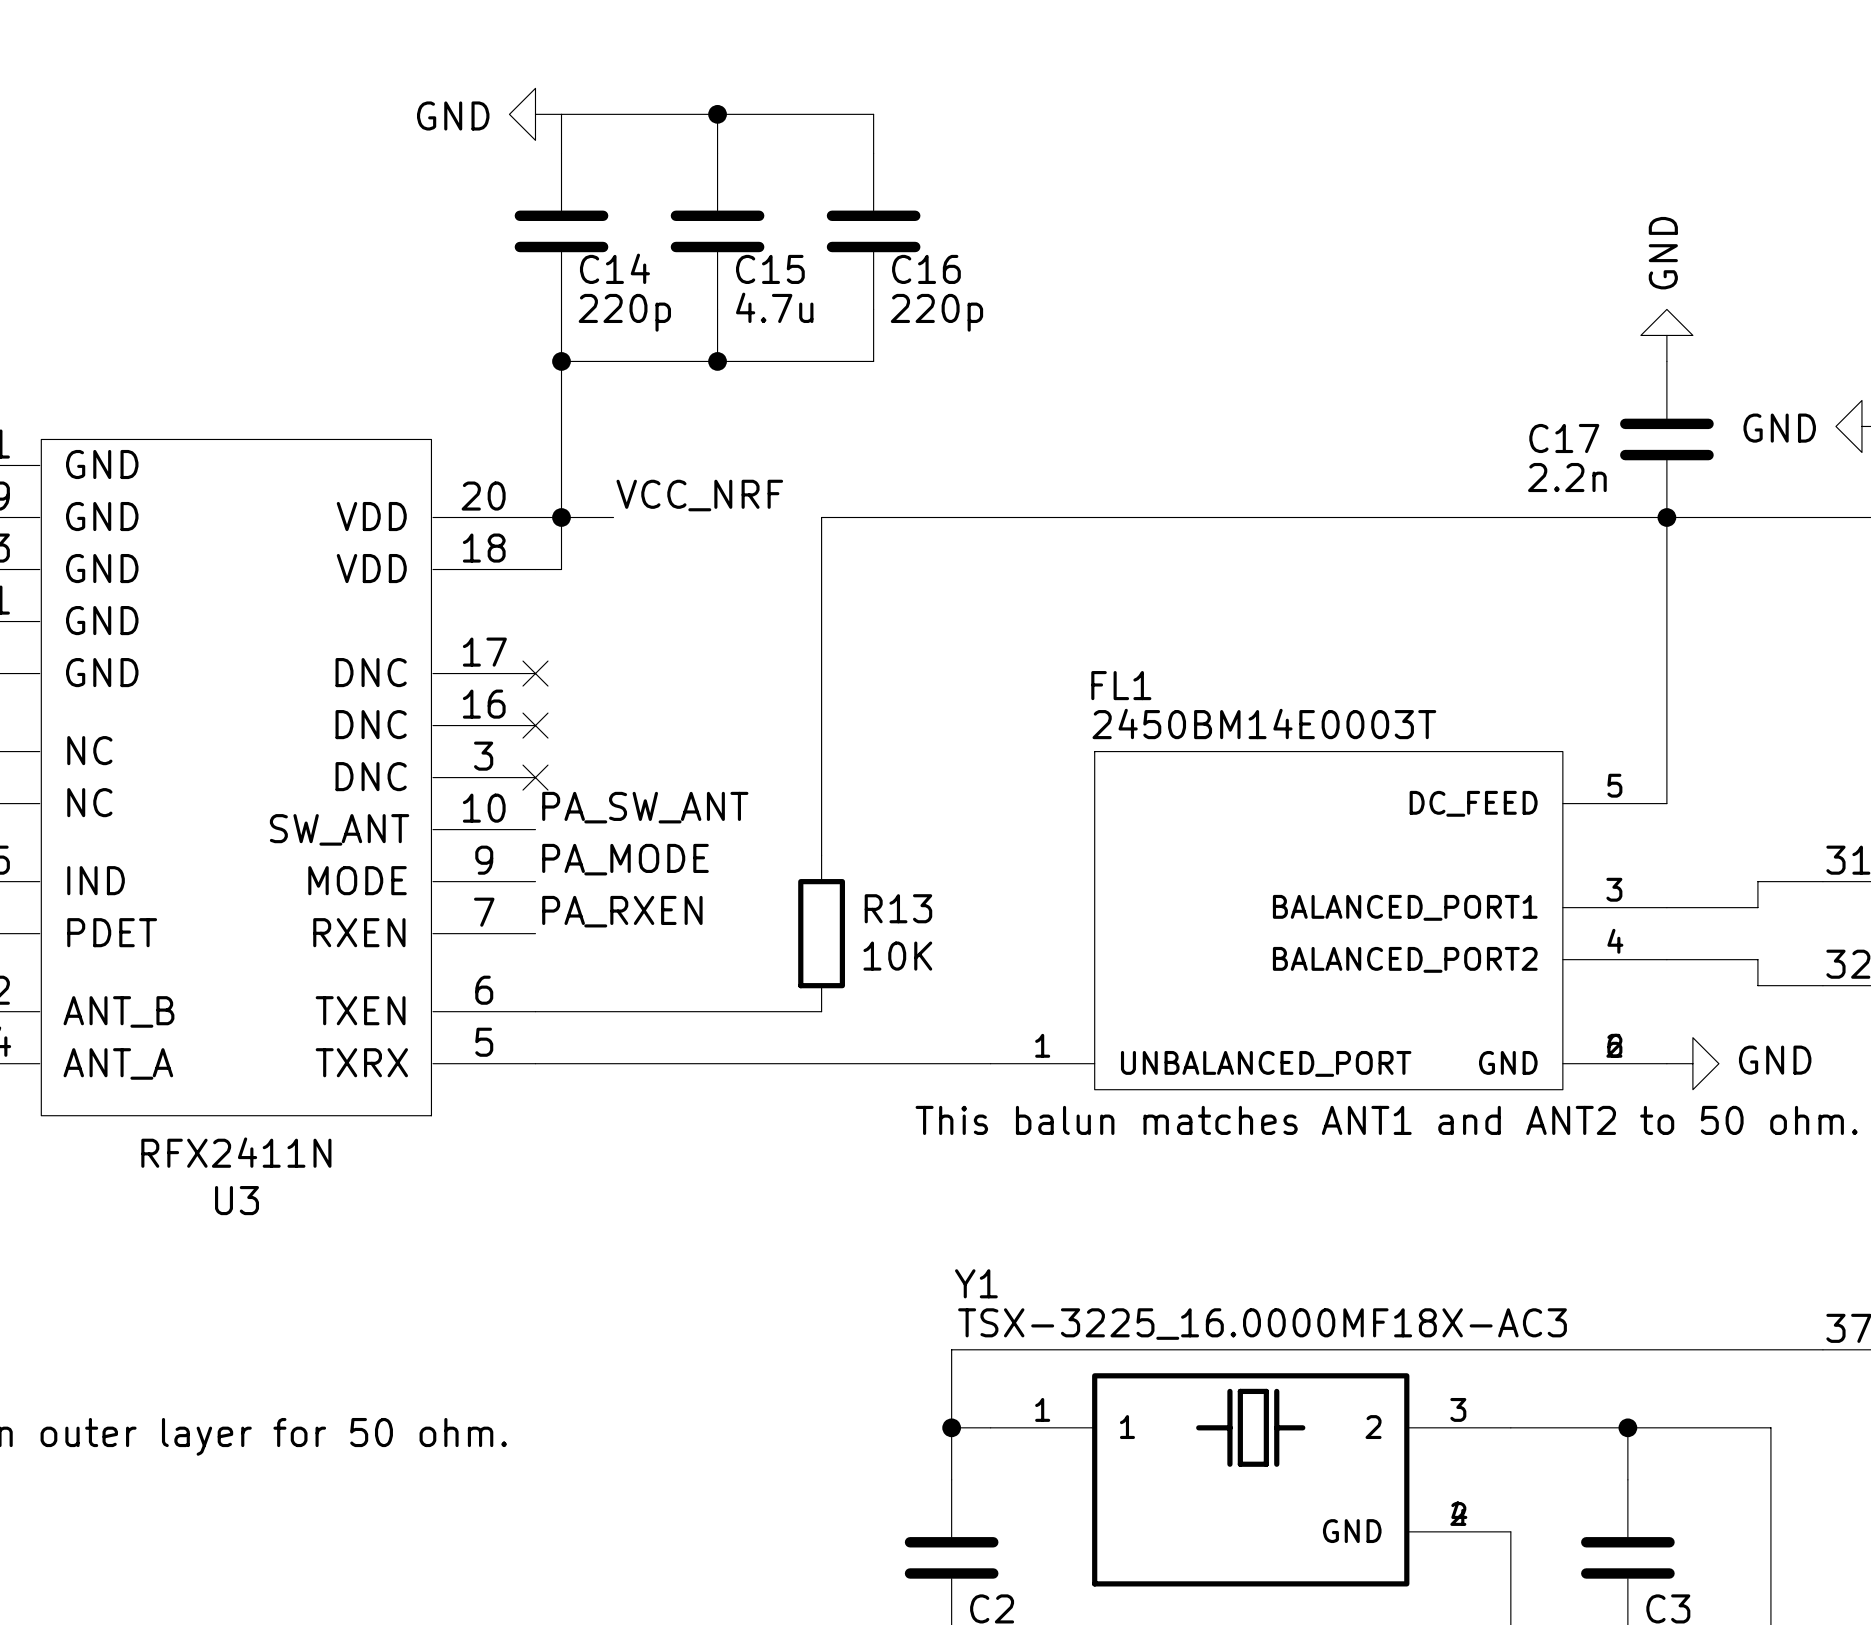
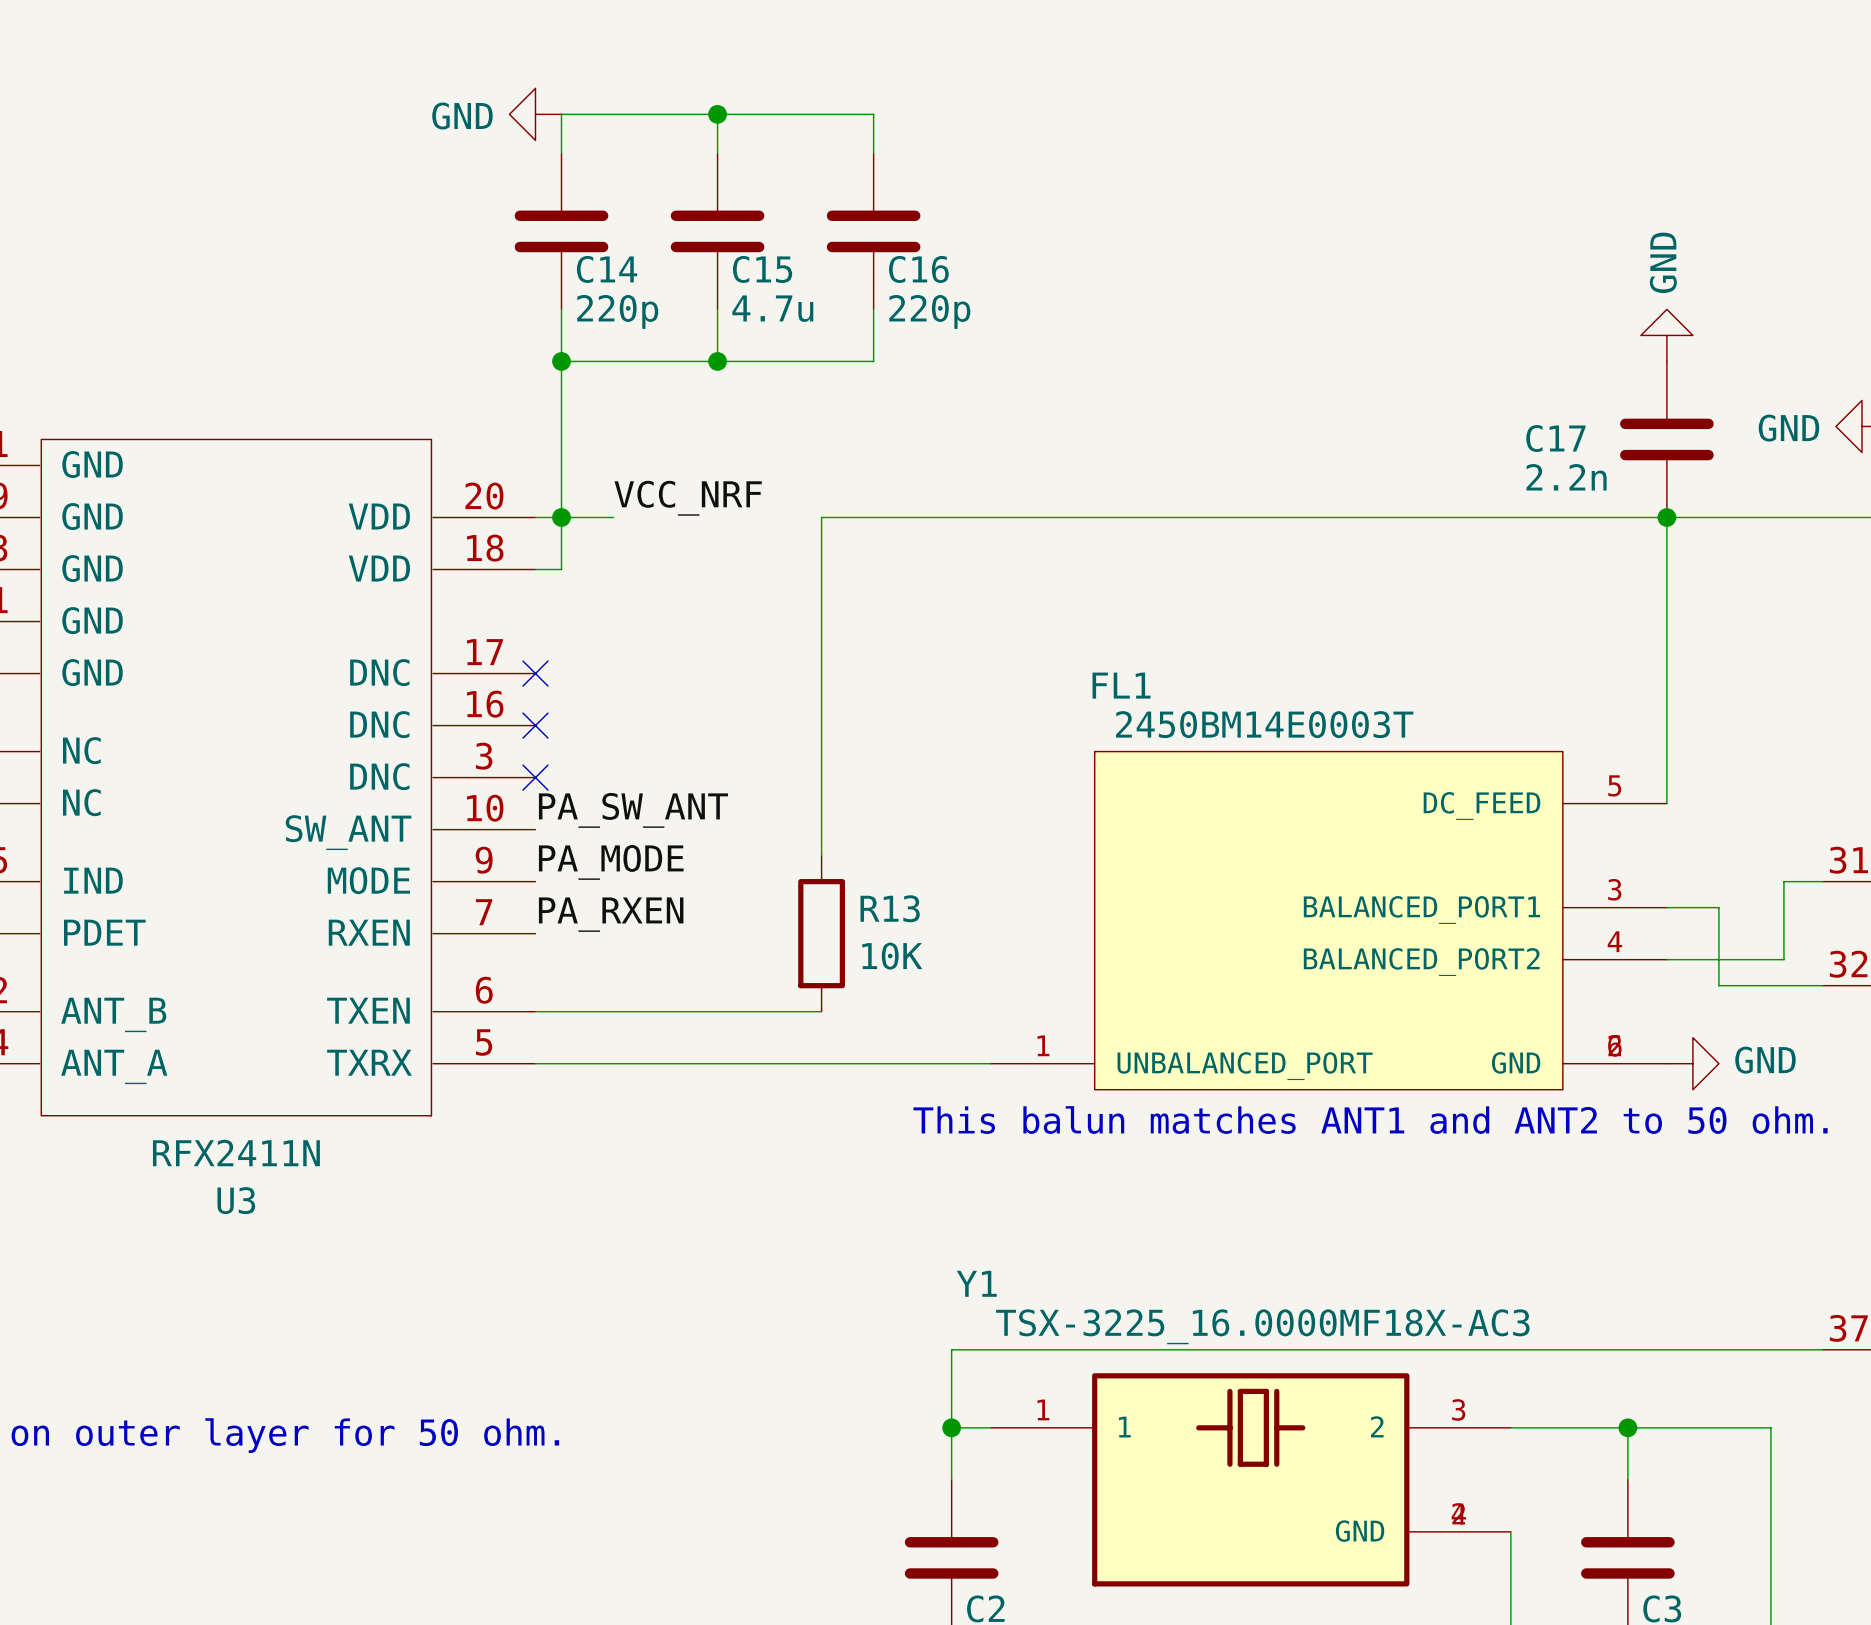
wire: (1783, 881) (1757, 881) (1757, 907) (1718, 907) -> (1783, 881) (1783, 959) (1757, 959)
wire: (1757, 959) (1757, 985) -> (1718, 907) (1718, 985) (1757, 985)

